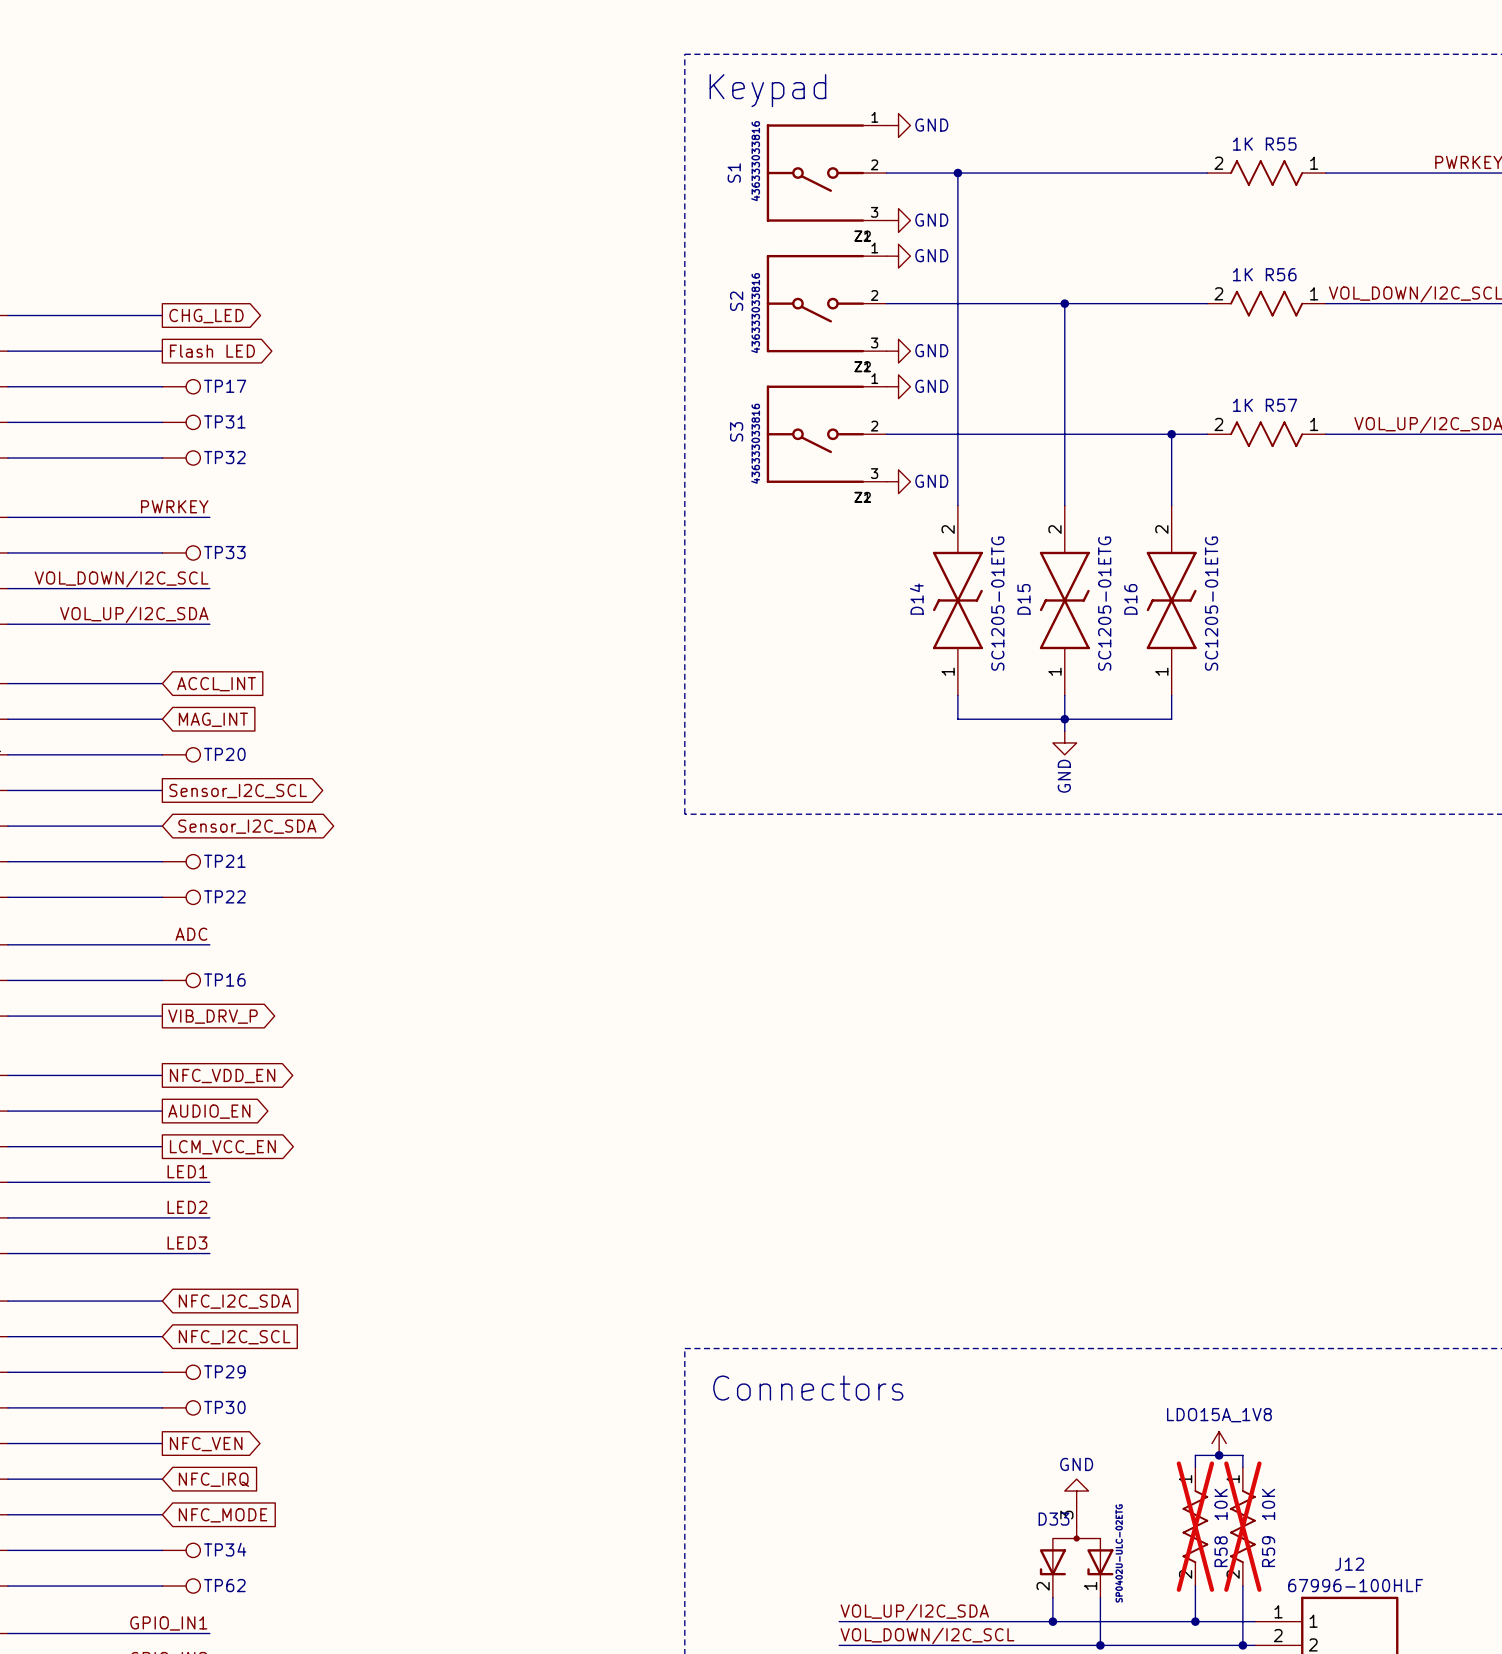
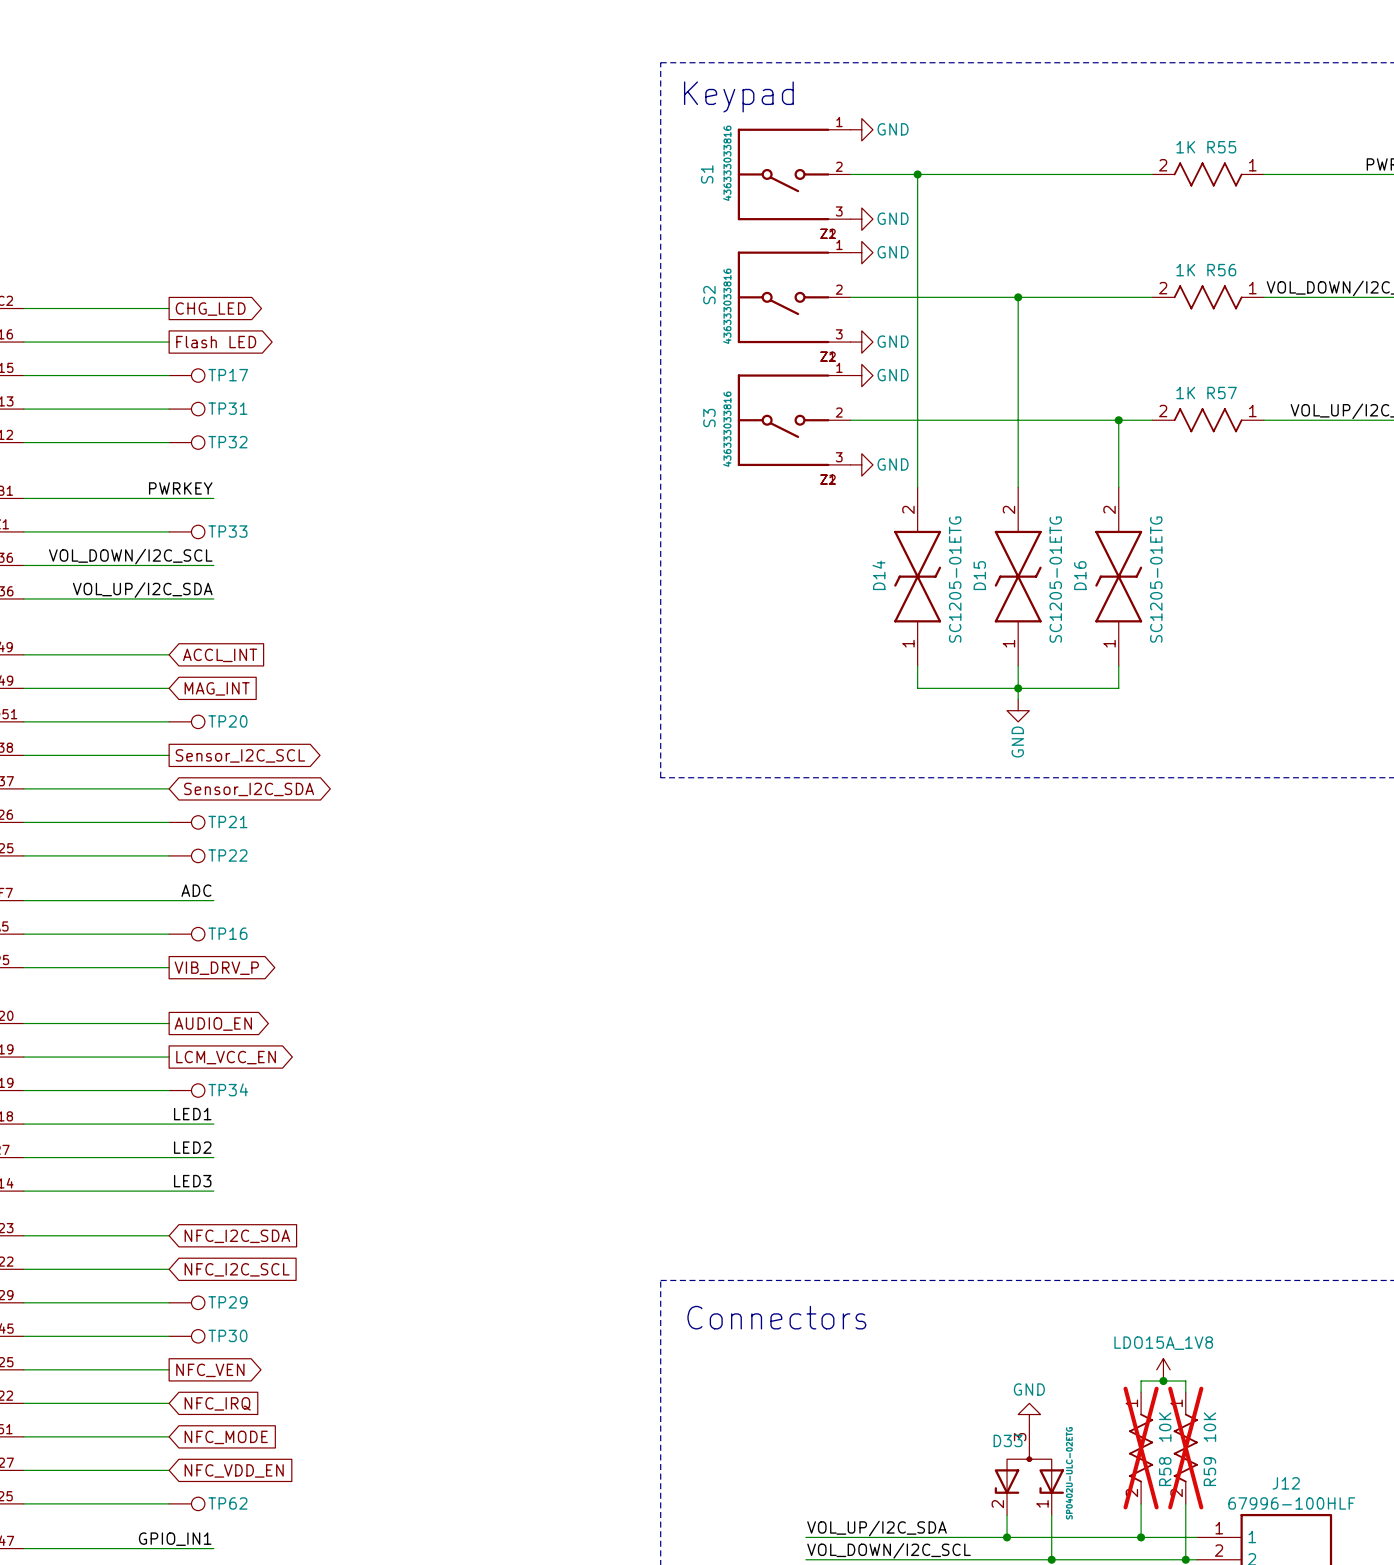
global label: NFC_VDD_EN (222, 1076) -> AUDIO_EN (213, 1024)
global label: AUDIO_EN (209, 1111) -> LCM_VCC_EN (226, 1057)
global label: LCM_VCC_EN (222, 1147) -> none
TP34 position: (181, 1550) -> (187, 1090)
global label: none -> NFC_VDD_EN (234, 1470)

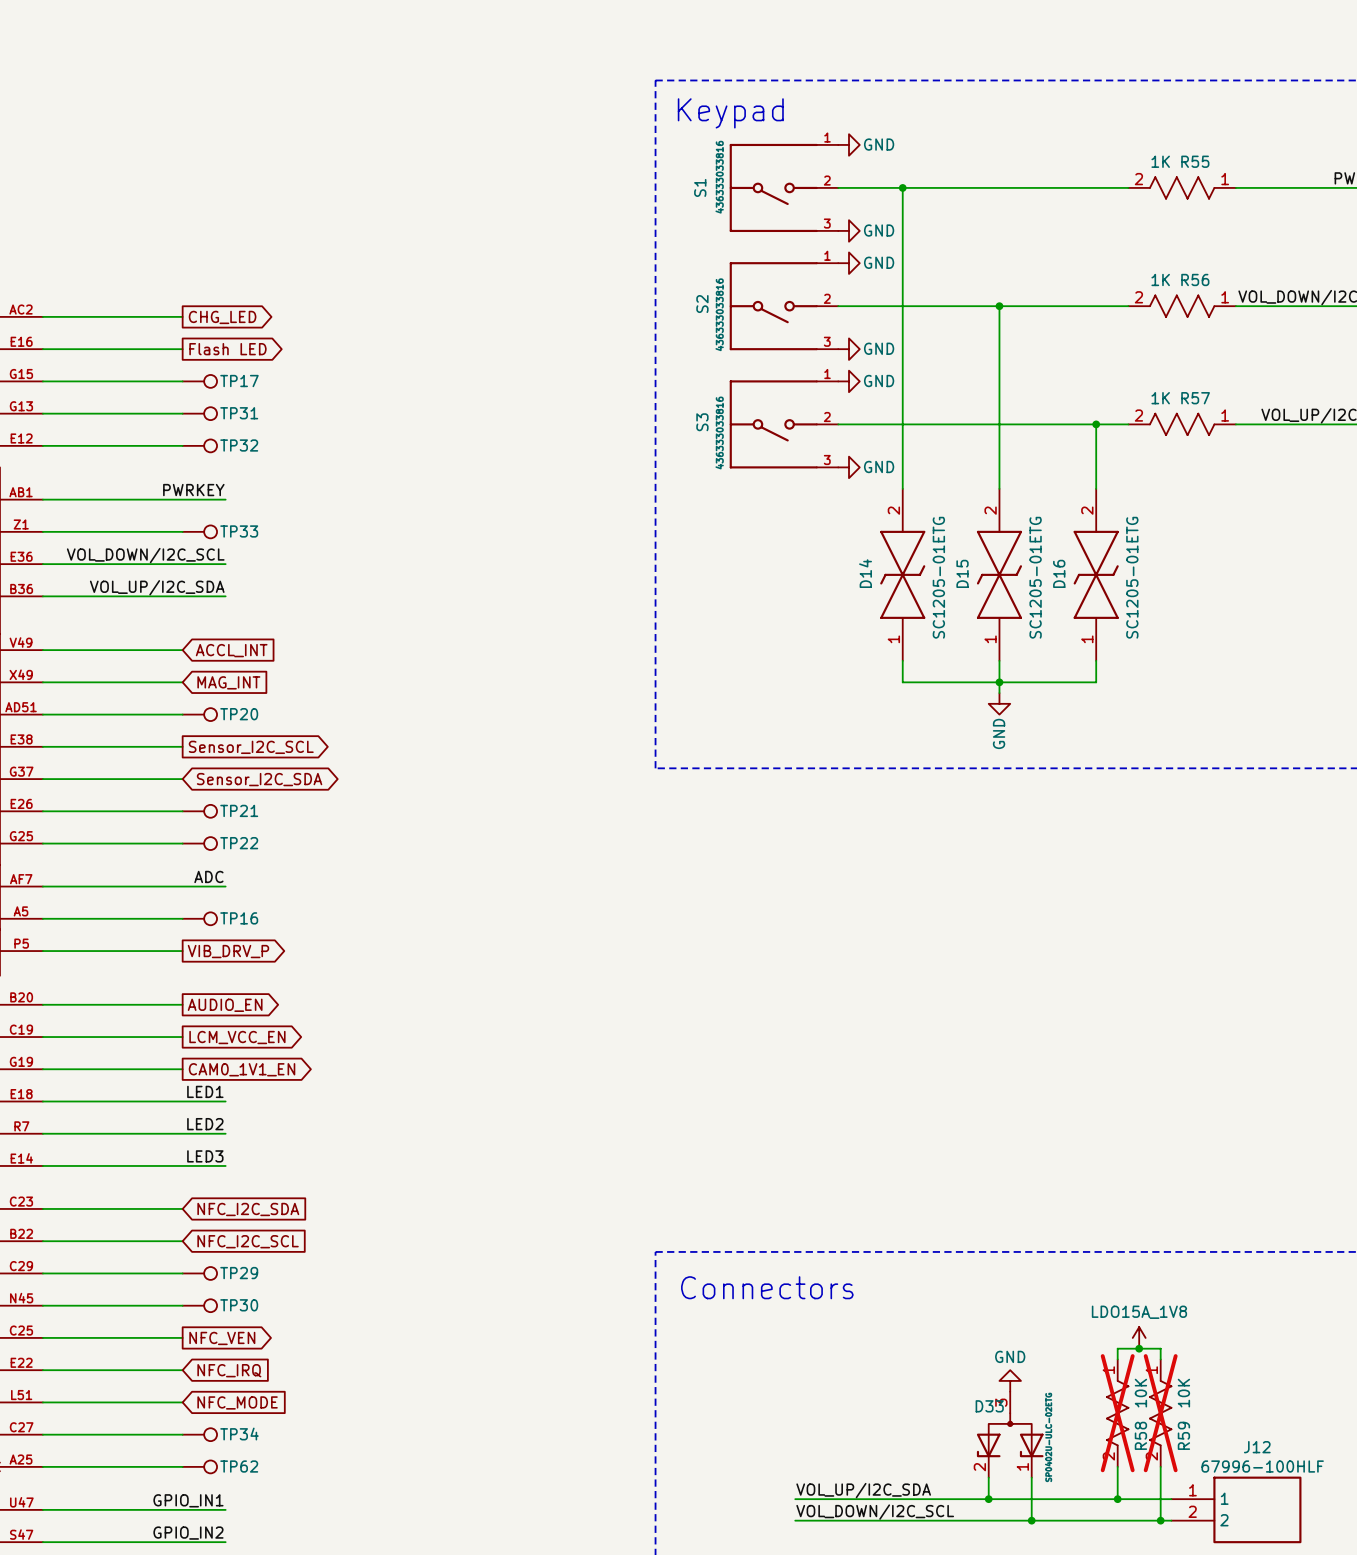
S1 symbol: [737, 128, 851, 221] -> [729, 143, 839, 233]
S2 symbol: [737, 251, 851, 344] -> [729, 262, 839, 351]
S3 symbol: [737, 374, 851, 467] -> [729, 380, 839, 469]
TP34 position: (187, 1090) -> (199, 1434)
global label: none -> CAM0_1V1_EN (242, 1069)
global label: NFC_VDD_EN (234, 1470) -> none

